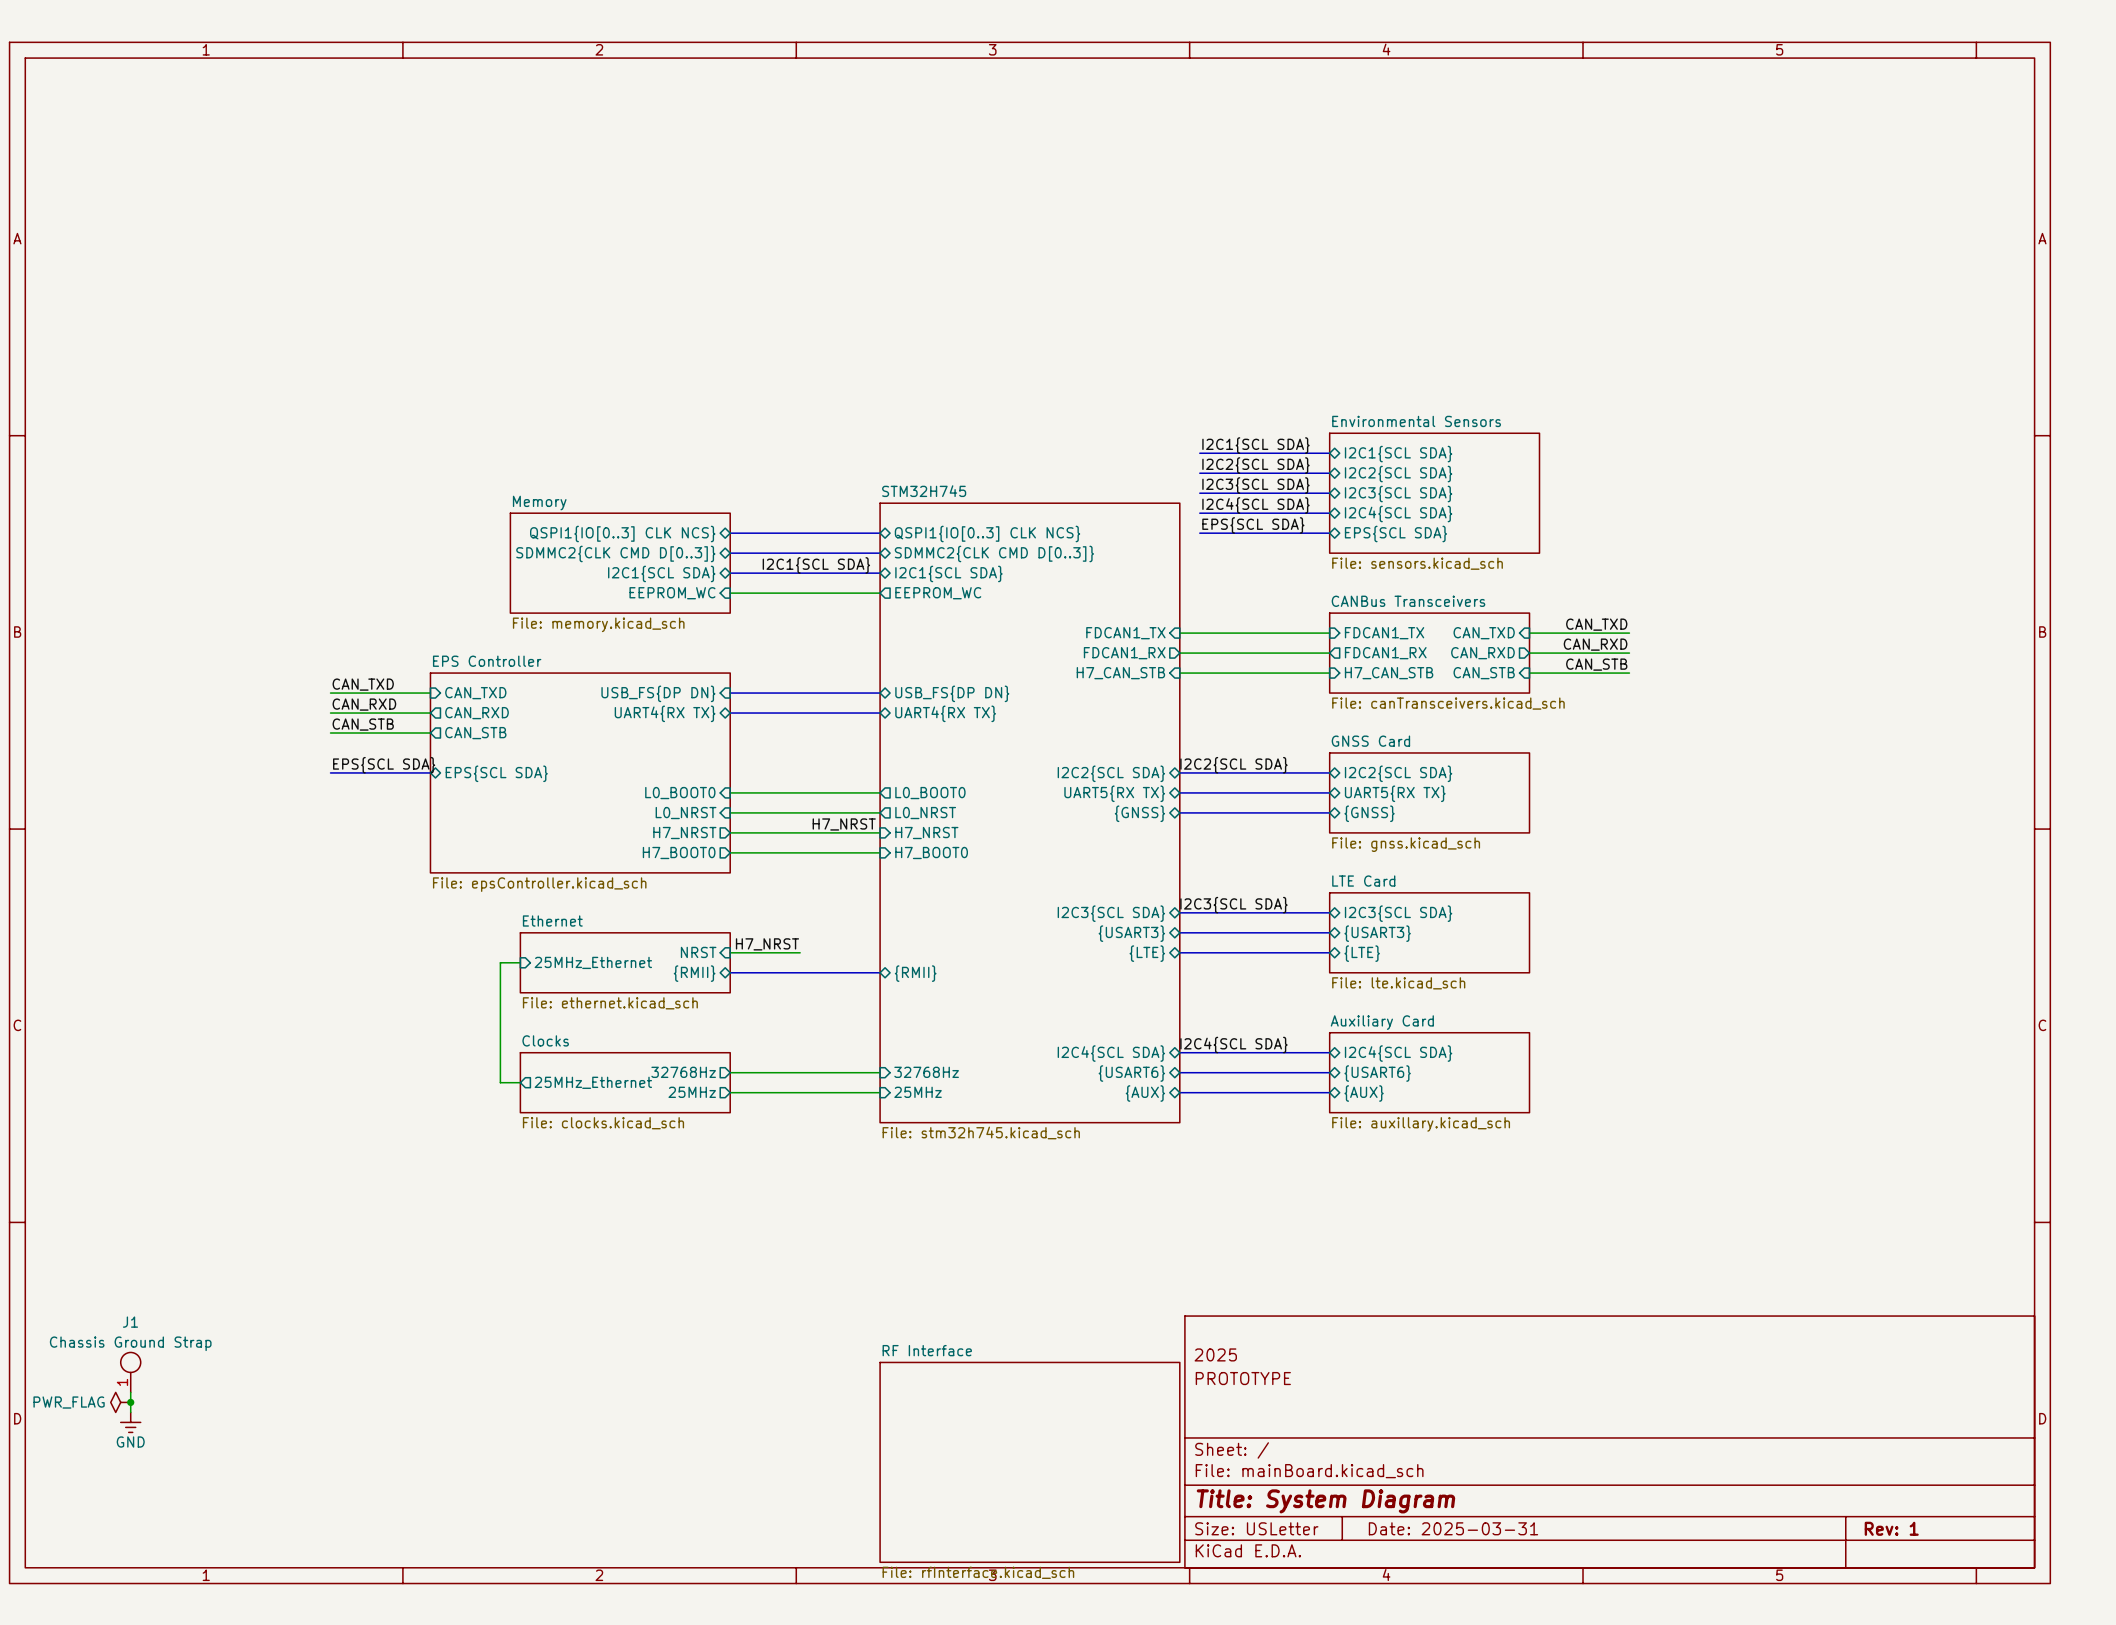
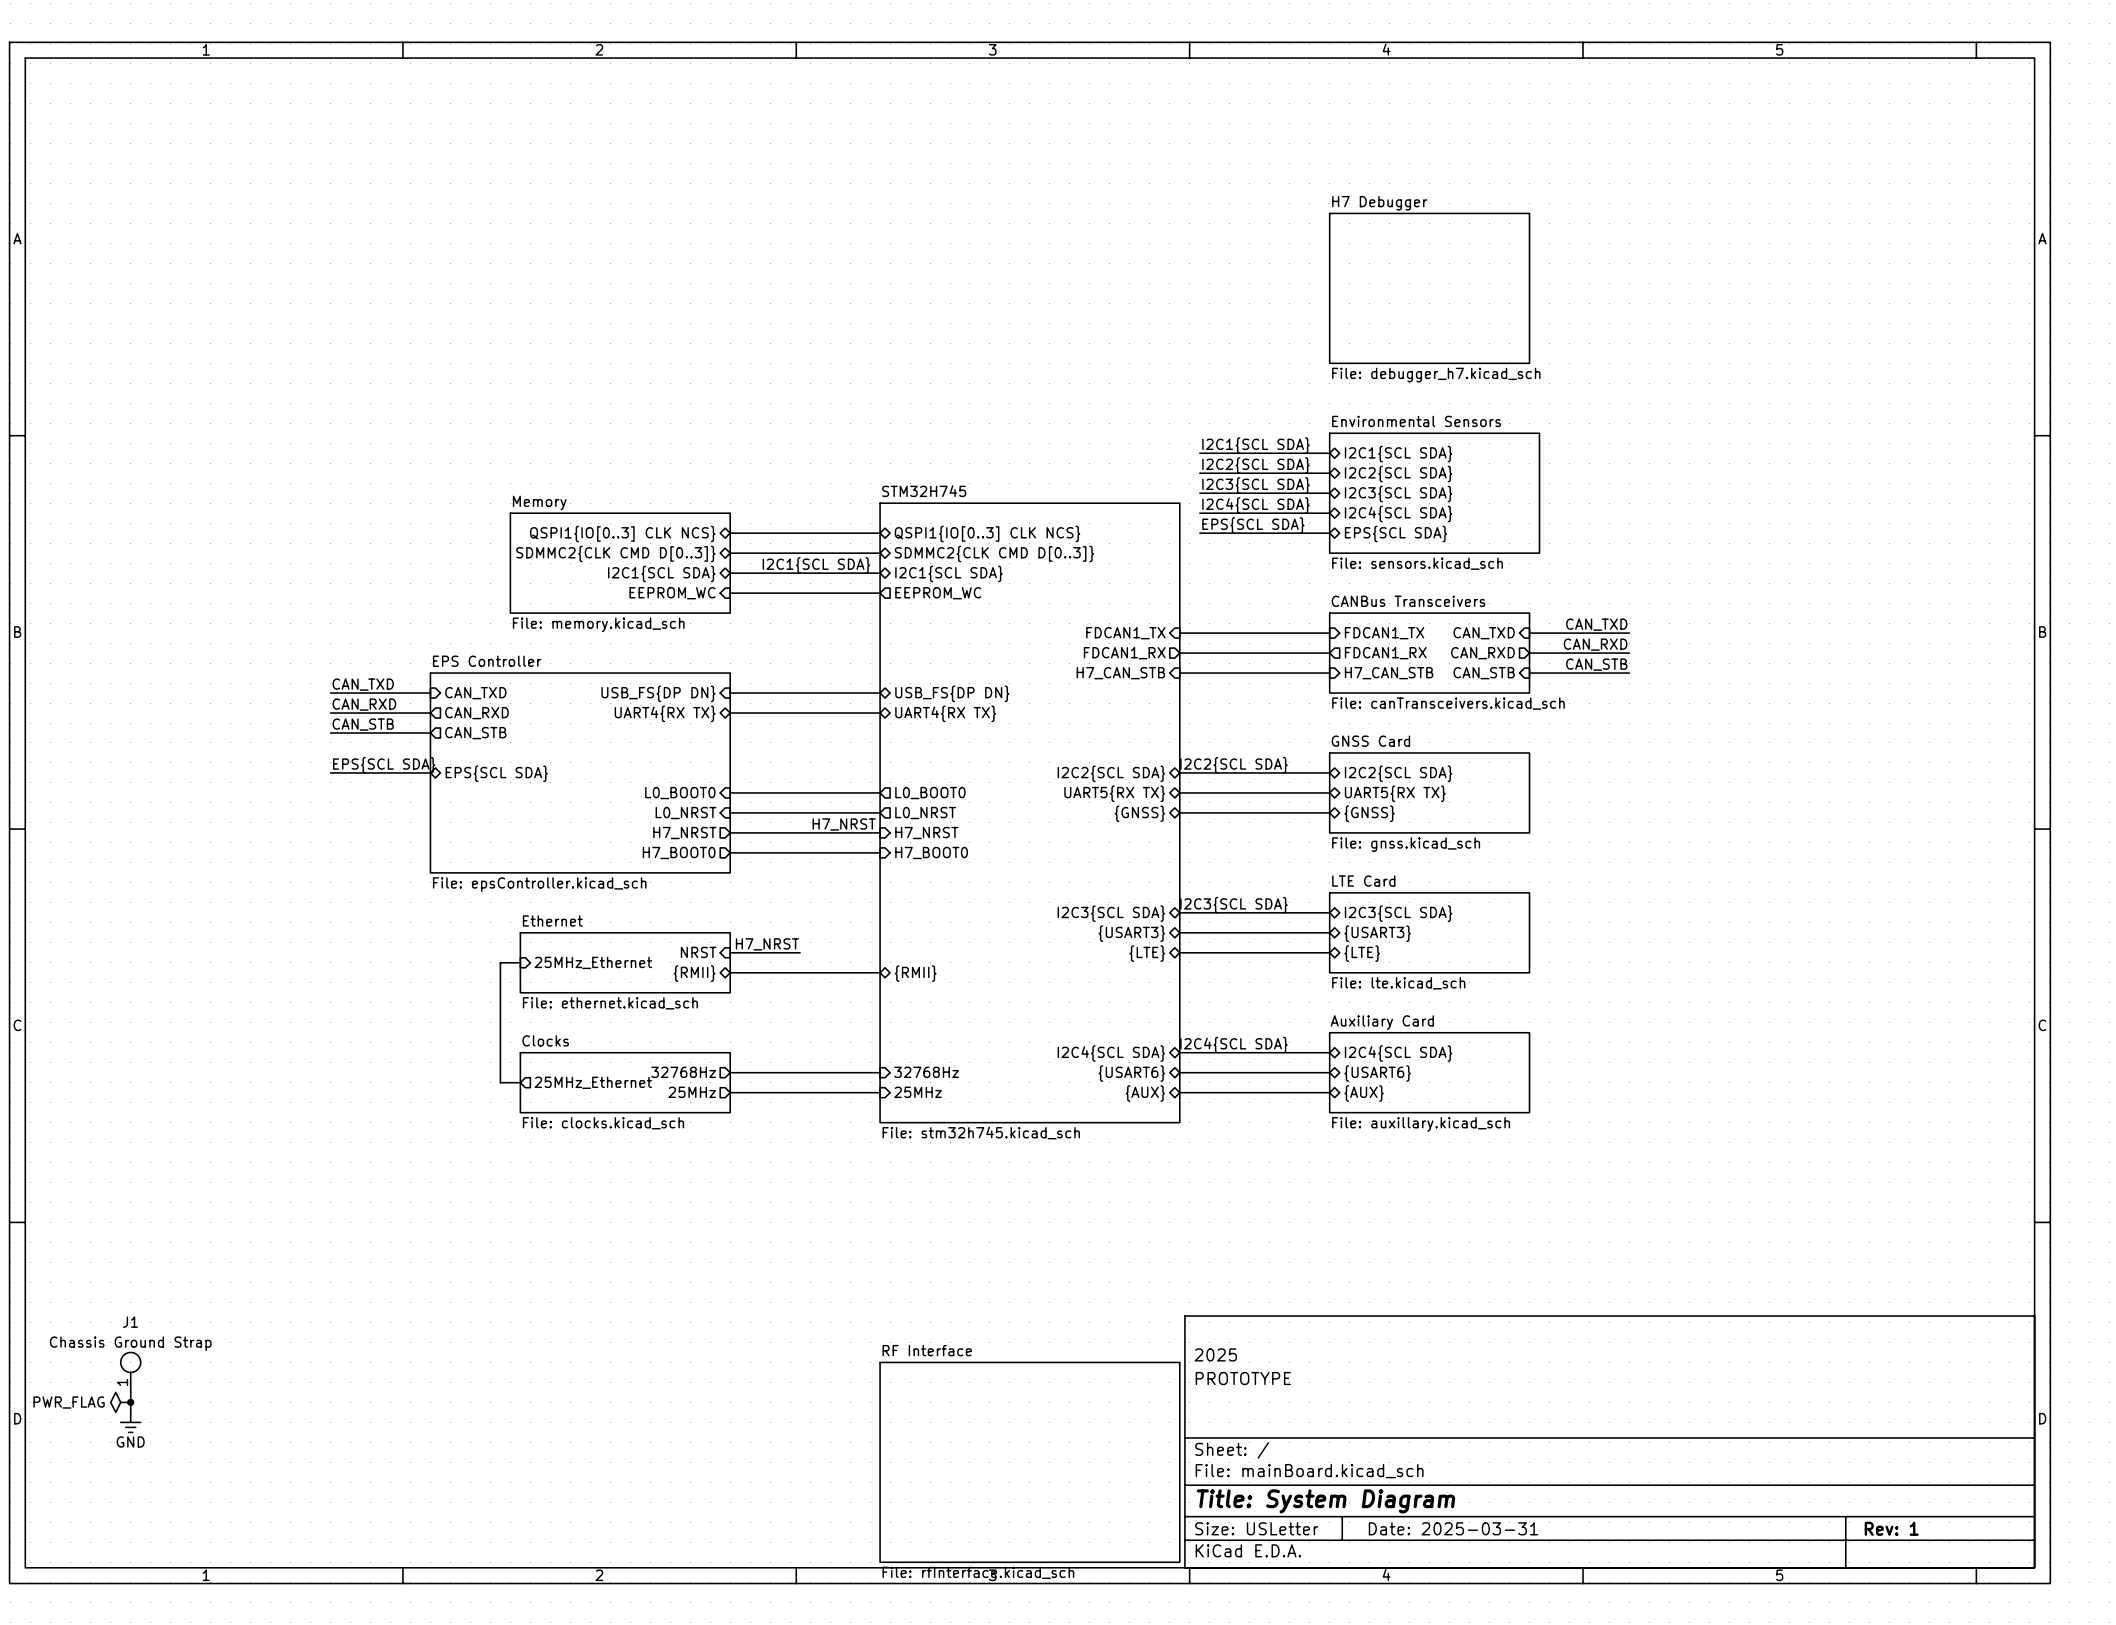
sheet H7 Debugger: none -> File: debugger_h7.kicad_sch (1429, 288)

